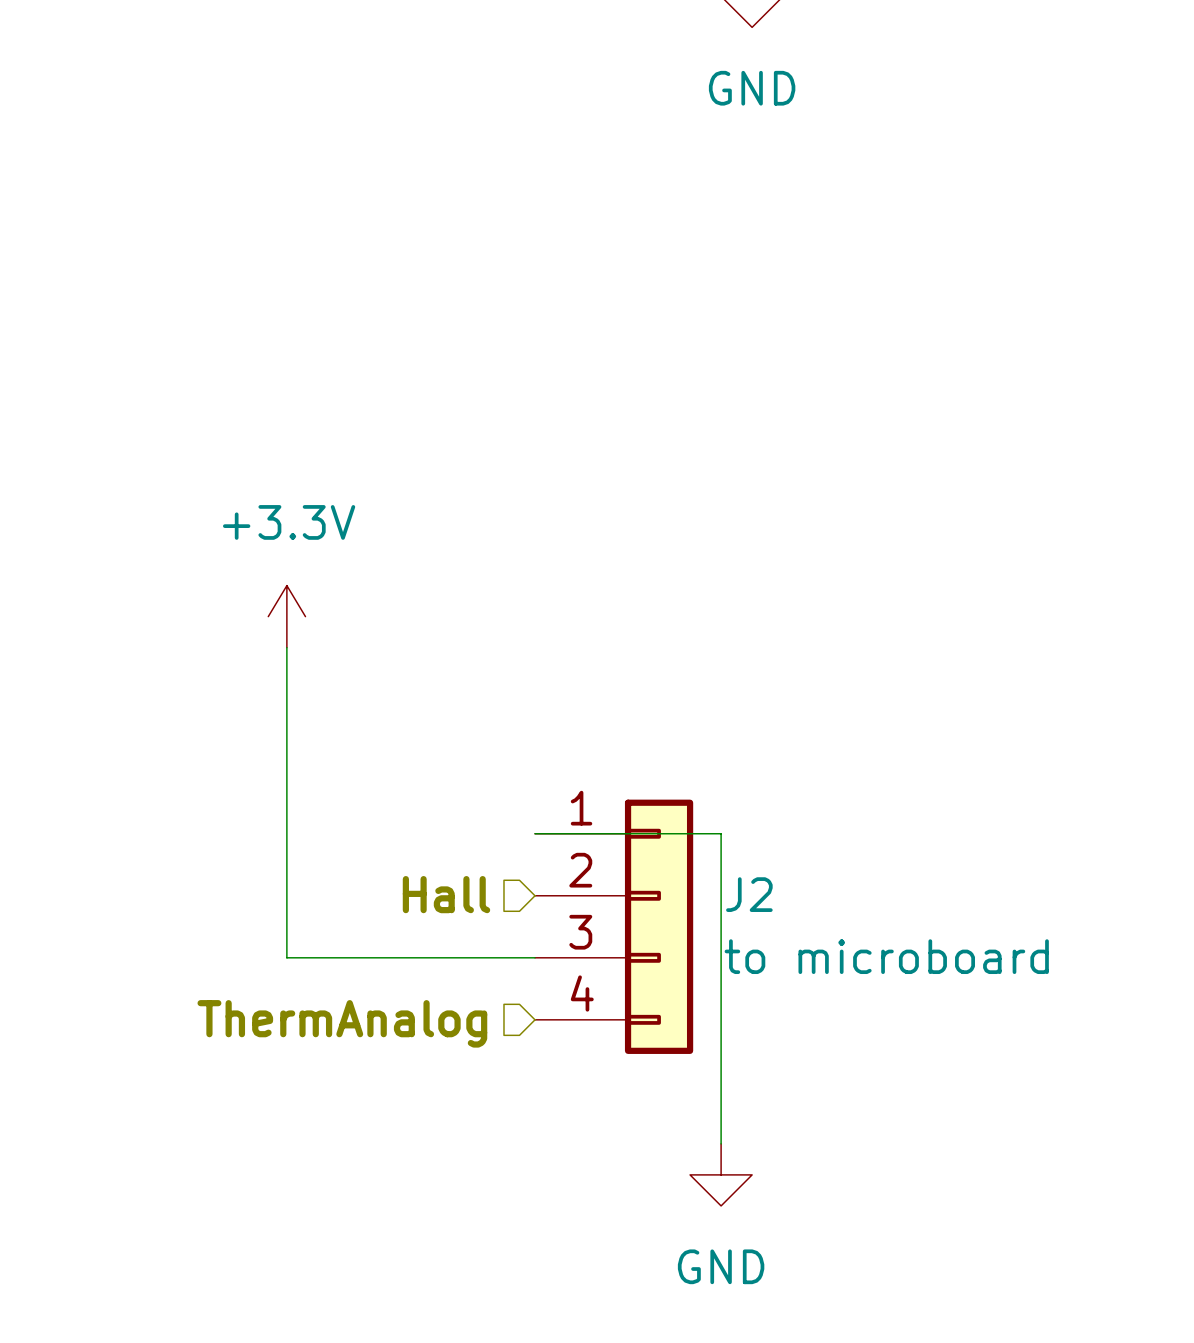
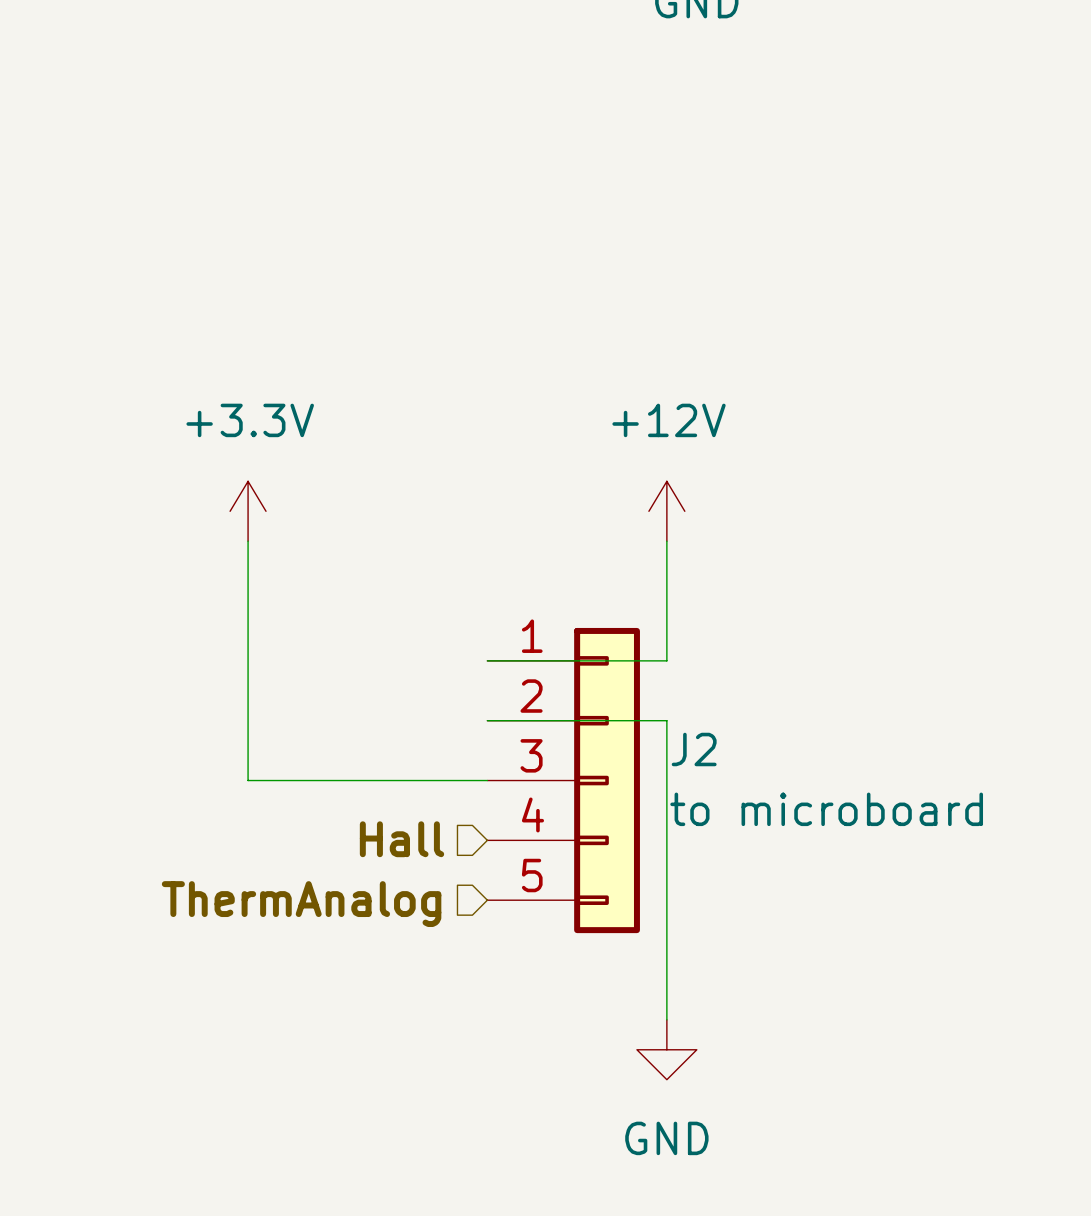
power symbol: none -> +12V (666, 511)
wire: none -> (666, 541) (666, 660) (487, 660)
J2 symbol: [535, 799, 694, 1054] -> [487, 627, 640, 934]
hierarchical label position: Hall (446, 894) -> Hall (402, 839)
wire: (286, 895) (286, 957) (535, 957) -> (248, 780) (487, 780)

